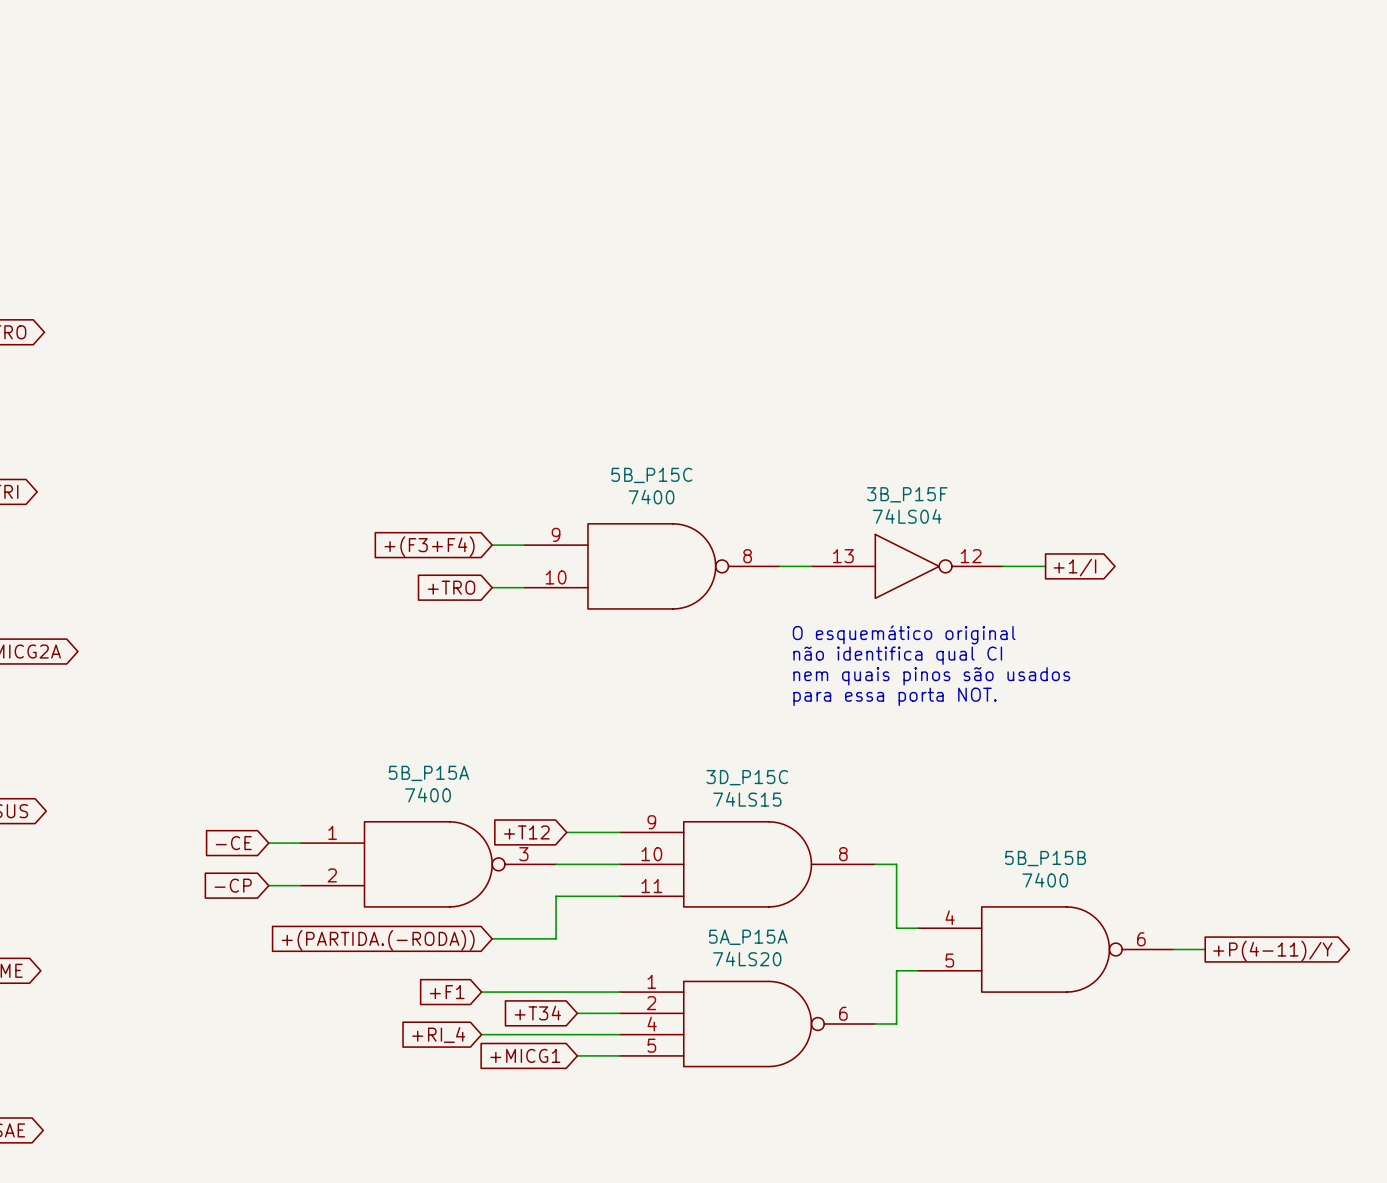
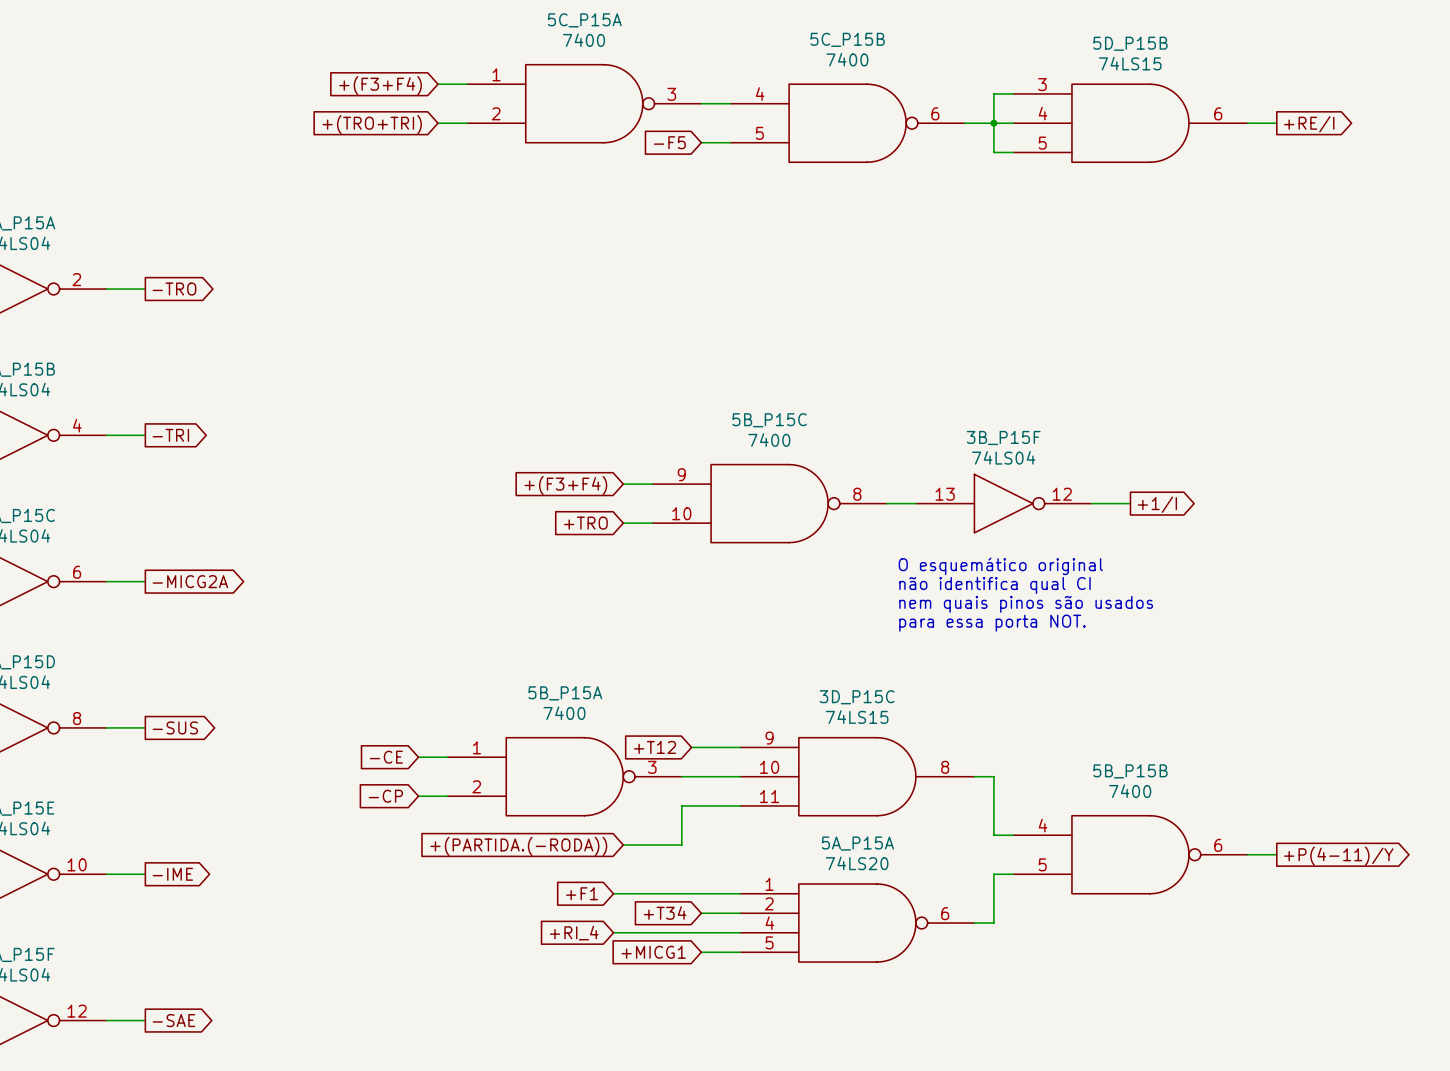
wire: none -> (437, 84) (467, 84)
global label: none -> +(F3+F4) (380, 85)
wire: none -> (1013, 93) (993, 93) (993, 152) (1013, 152)
5C_P15A: none -> 7400 (584, 103)
wire: none -> (701, 103) (730, 103)
wire: none -> (437, 123) (467, 123)
5C_P15B: none -> 7400 (847, 123)
wire: none -> (964, 123) (1013, 123)
junction: none -> (993, 123)
5D_P15B: none -> 74LS15 (1130, 123)
wire: none -> (1247, 123) (1276, 123)
global label: none -> +(TRO+TRI) (372, 124)
global label: none -> +RE/I (1309, 124)
global label: none -> -F5 (669, 142)
wire: none -> (701, 142) (730, 142)

